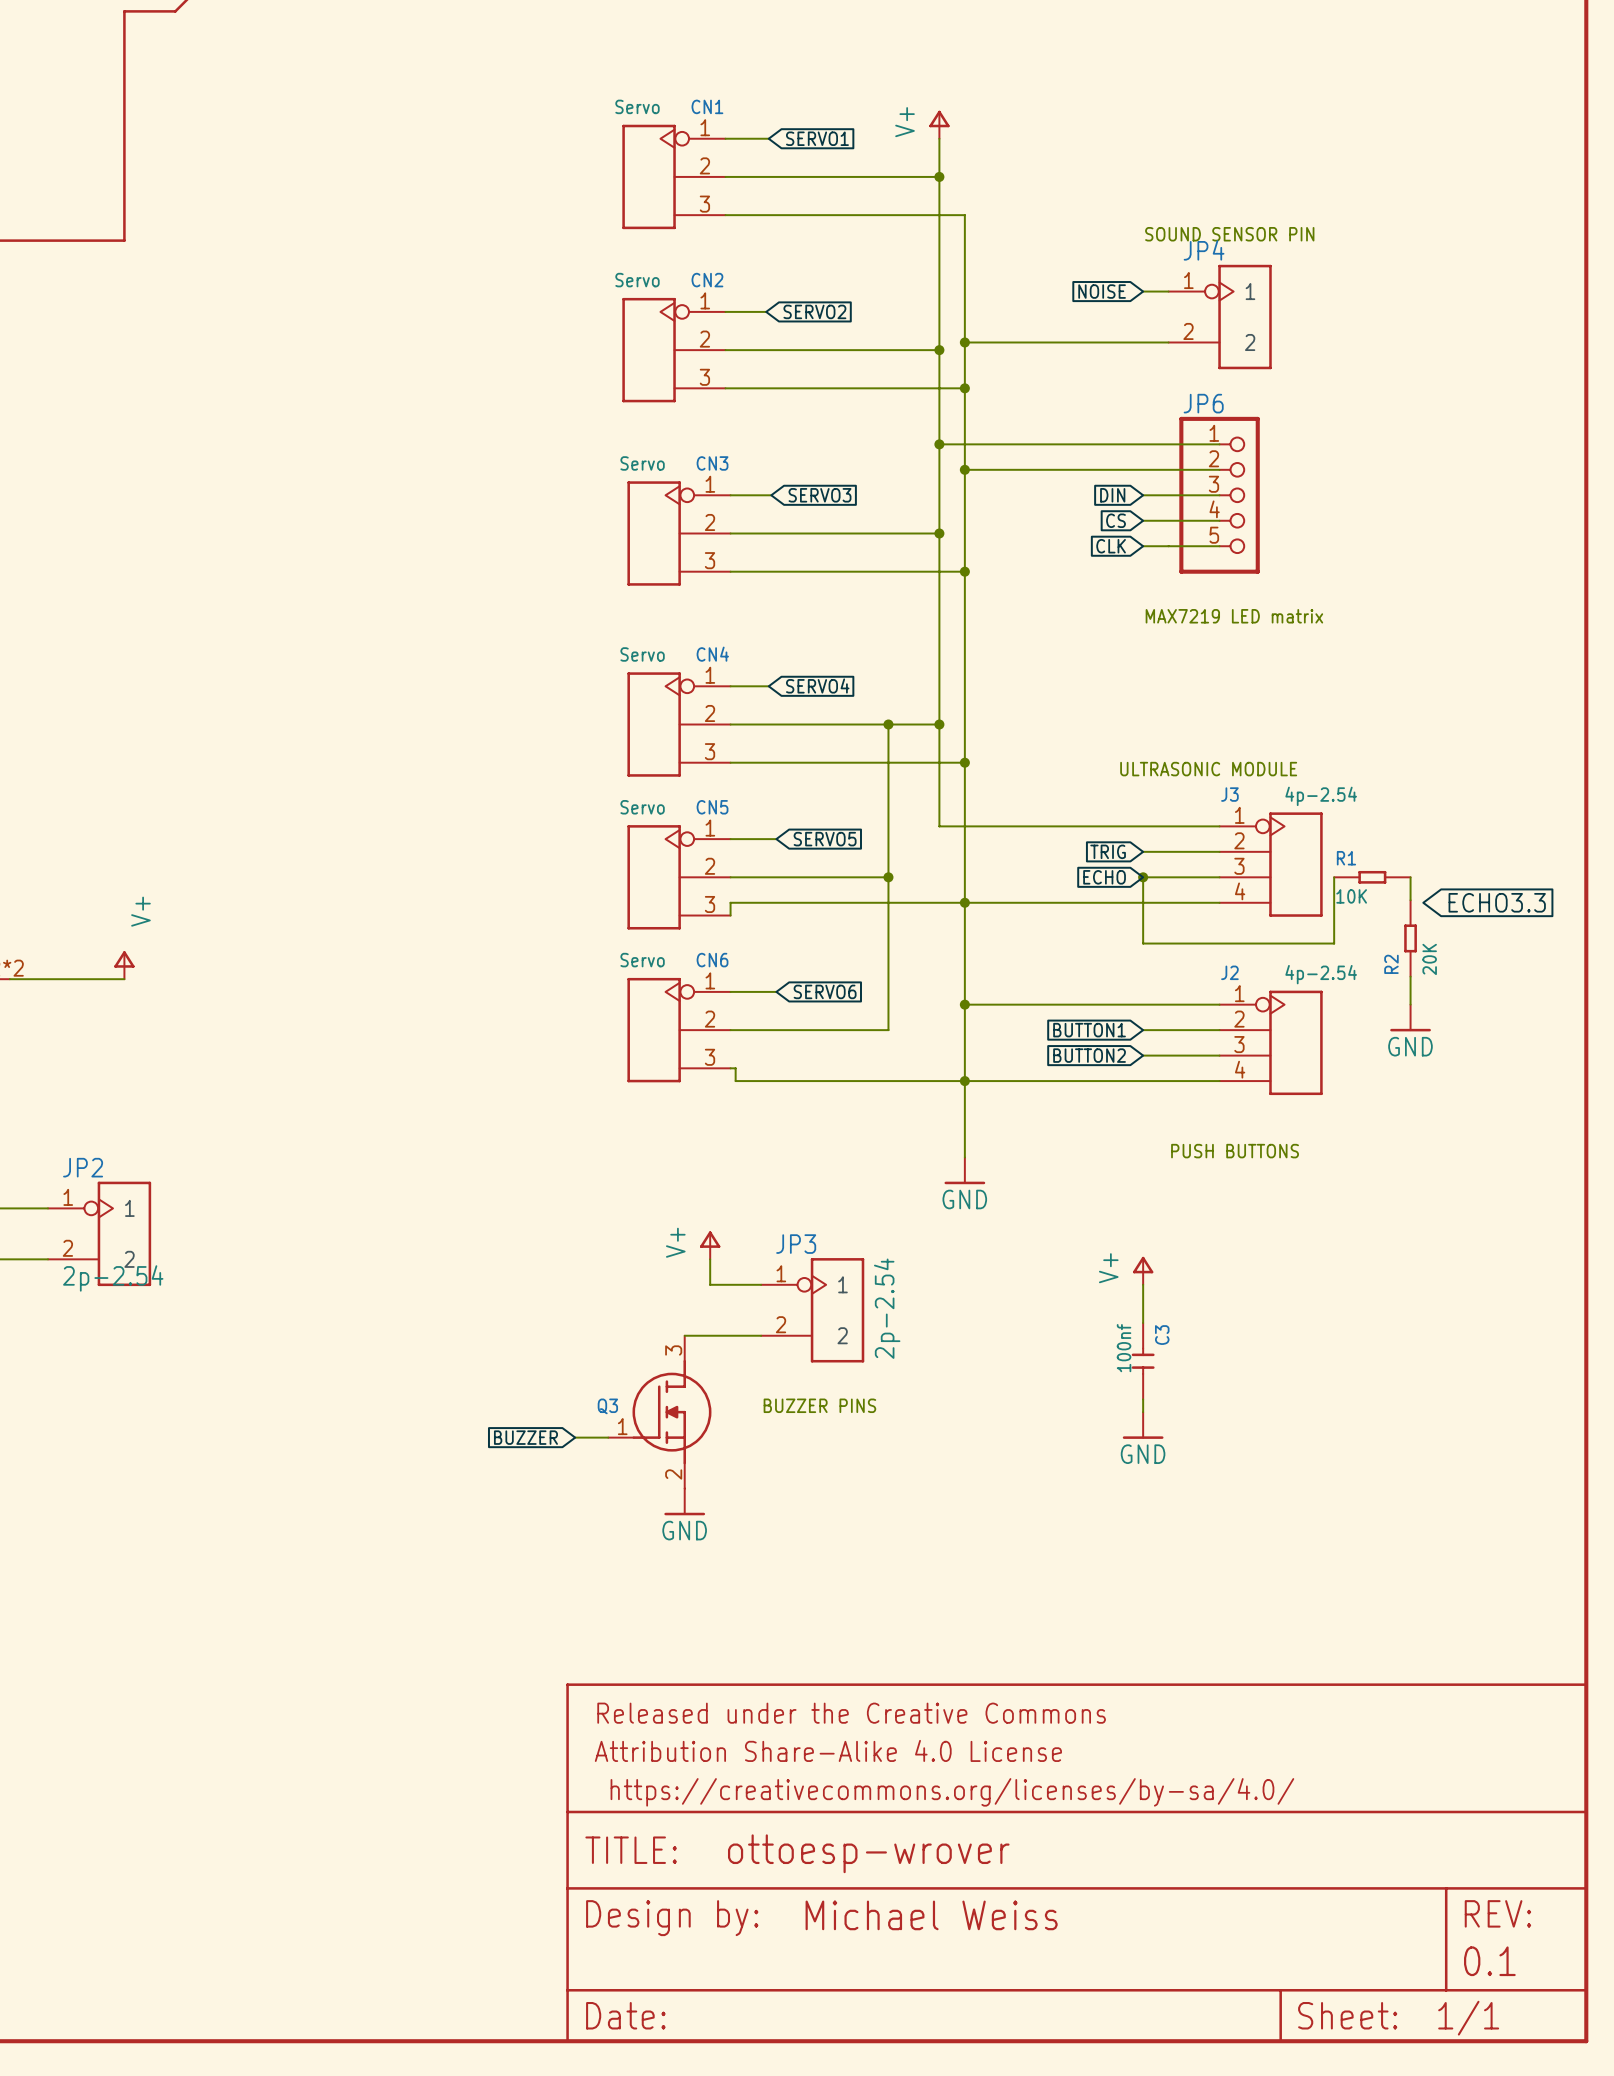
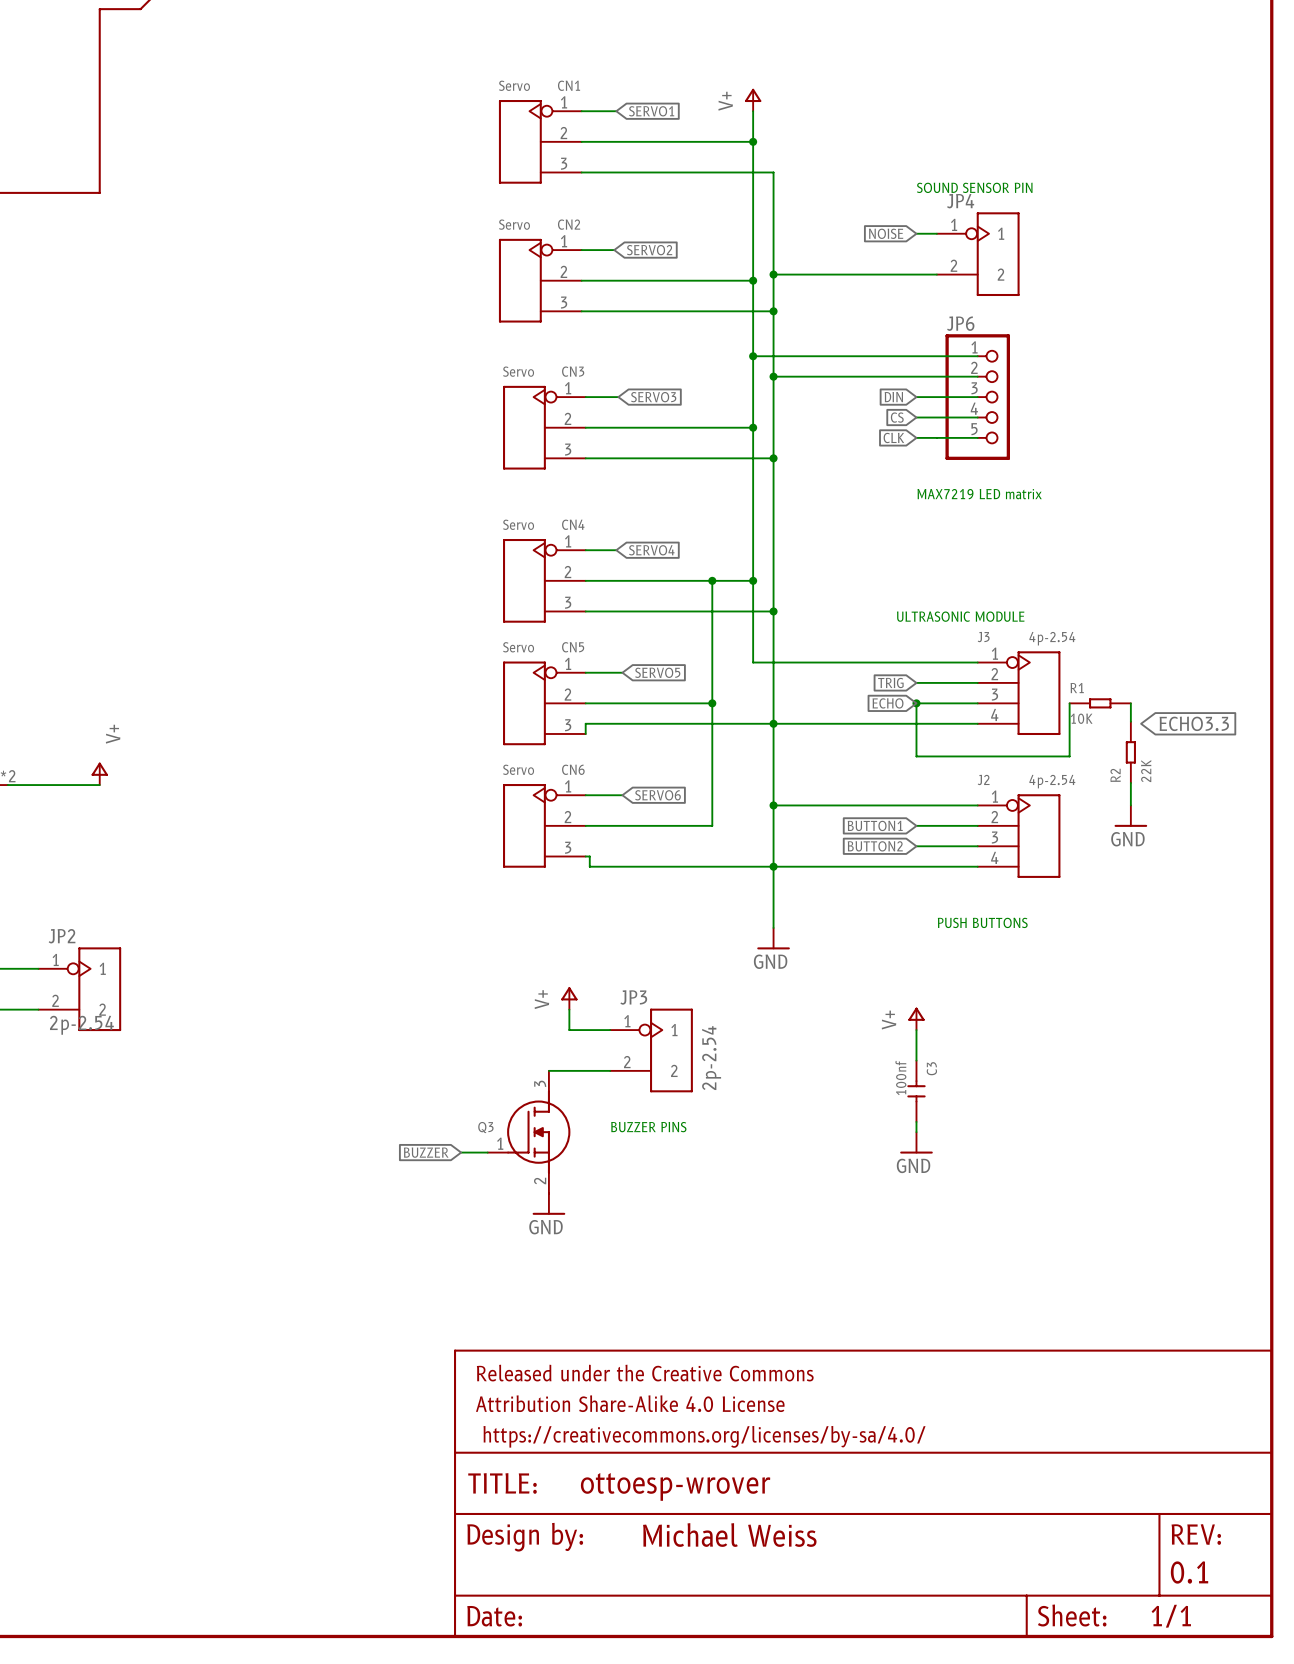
R2 value: 20K (1429, 959) -> 22K (1146, 771)

